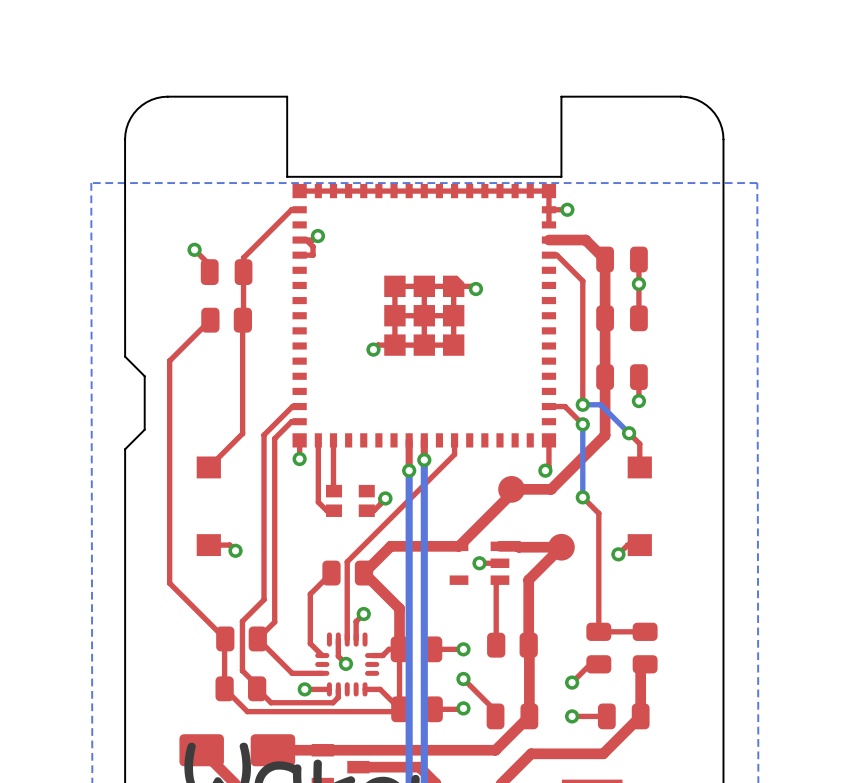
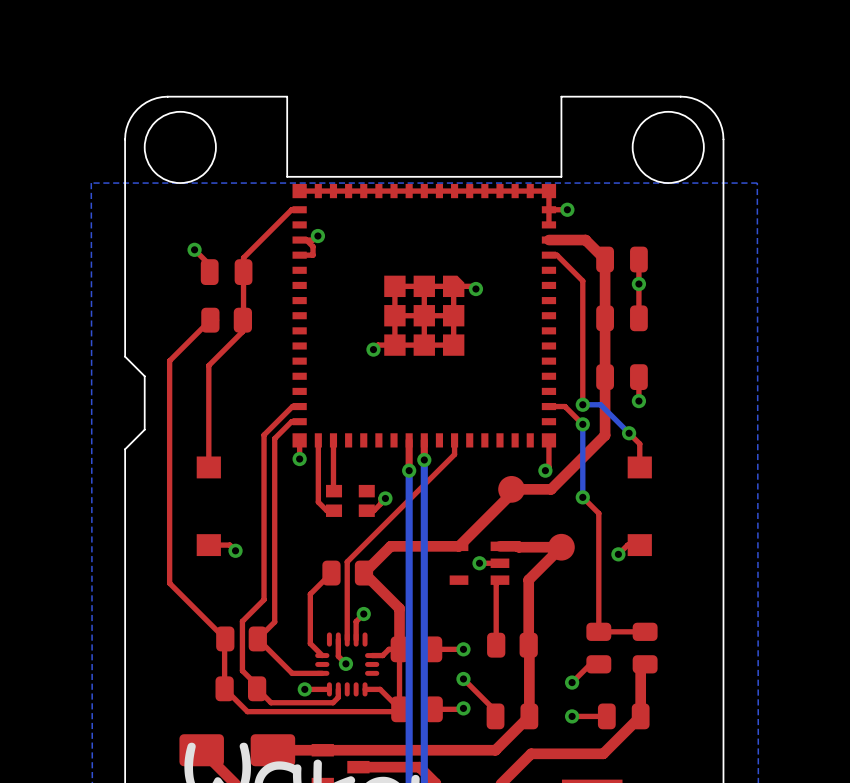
round board edge: none -> [143, 110, 217, 184]
round board edge: none -> [631, 110, 705, 184]
top track: (242, 331) (242, 433) (208, 467) -> (242, 331) (208, 365) (208, 467)

